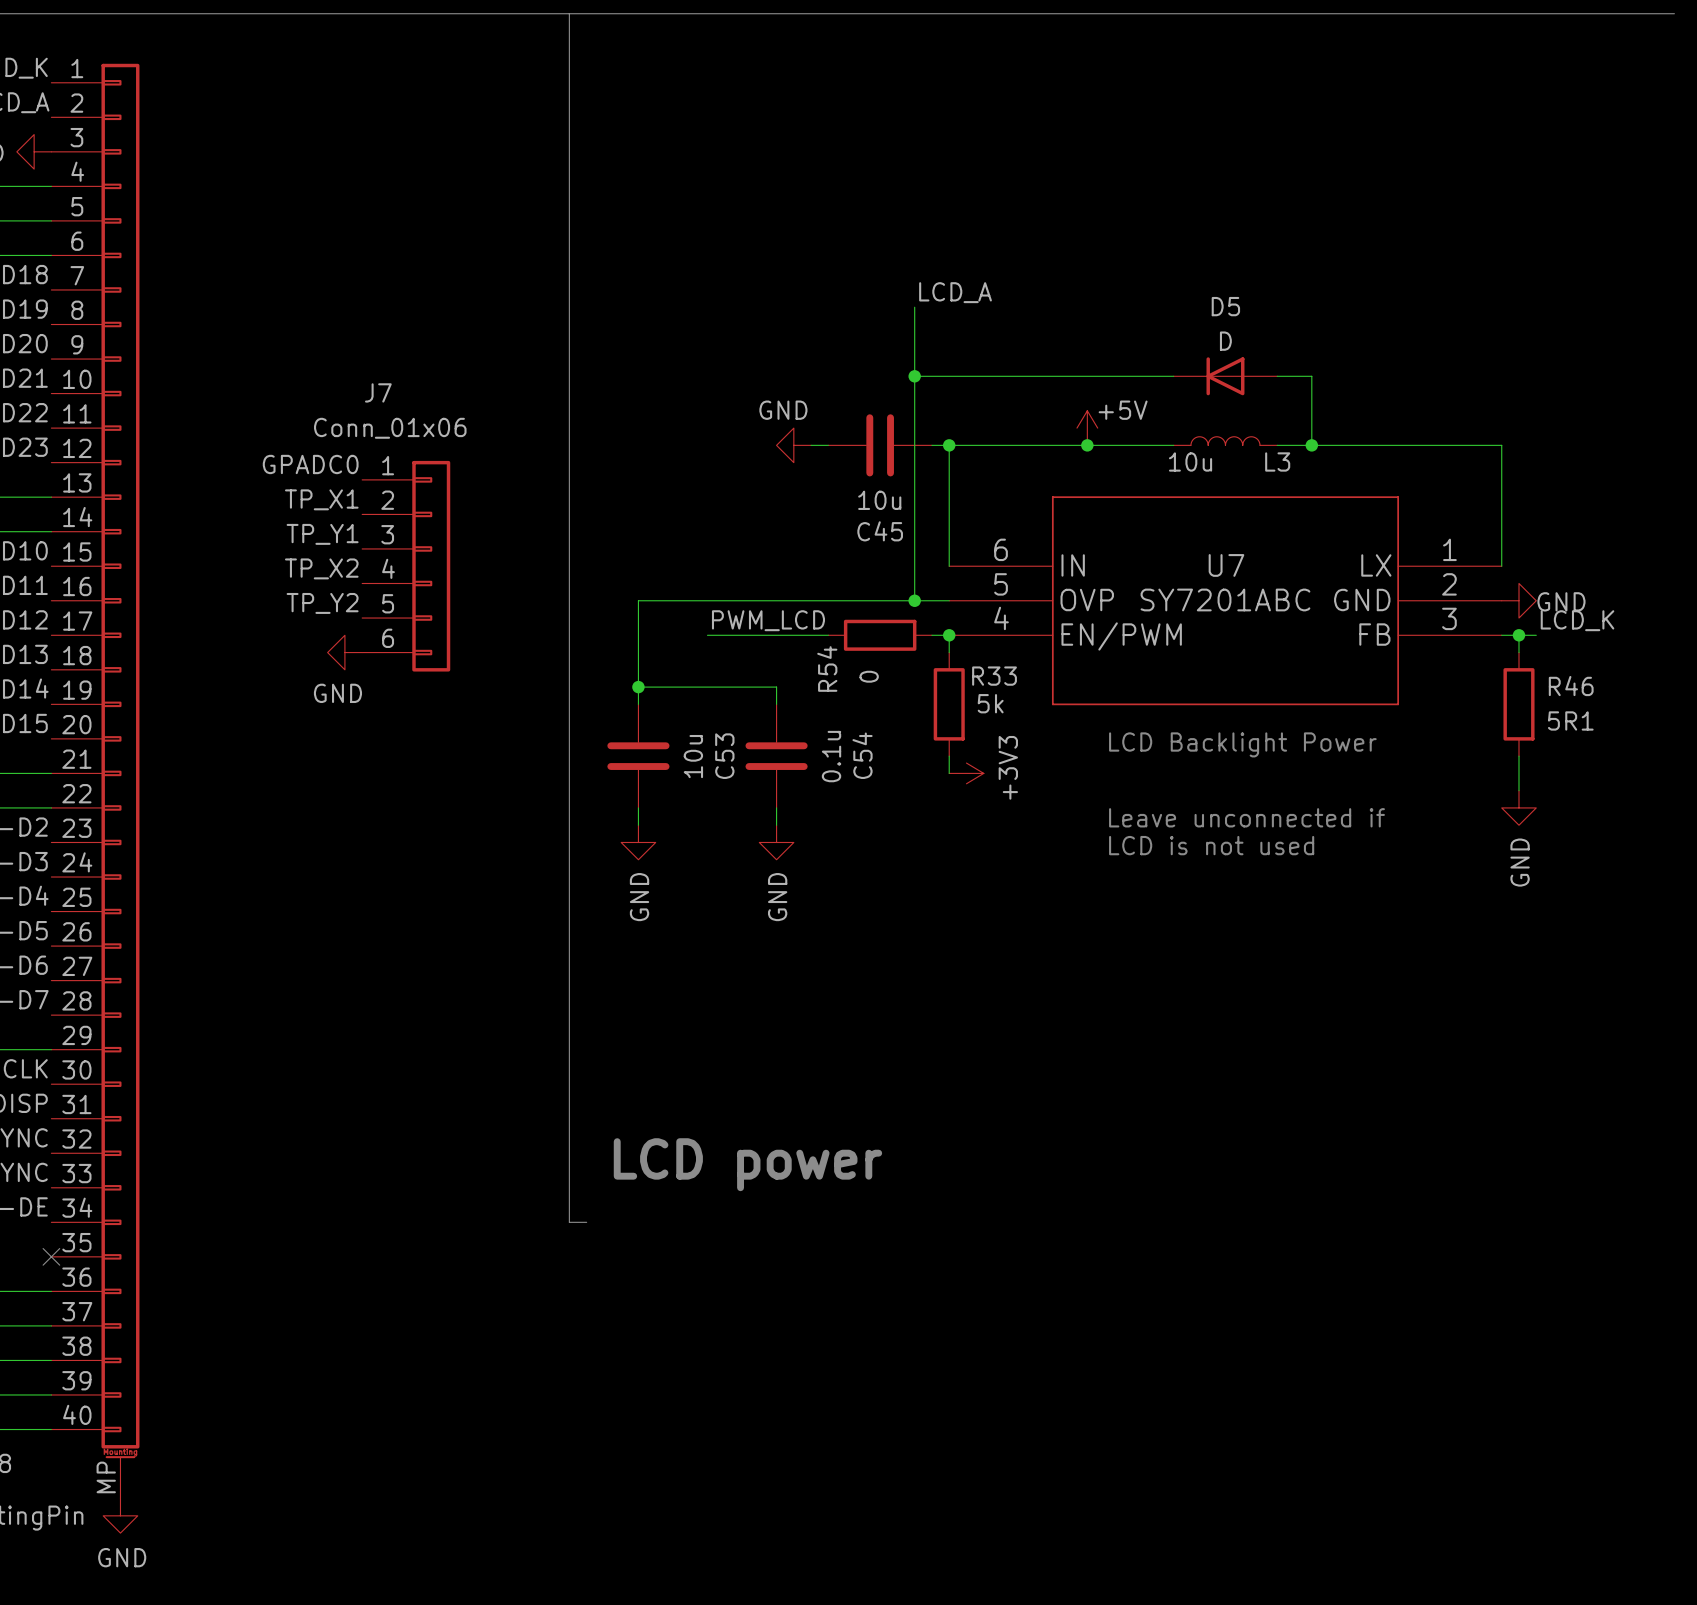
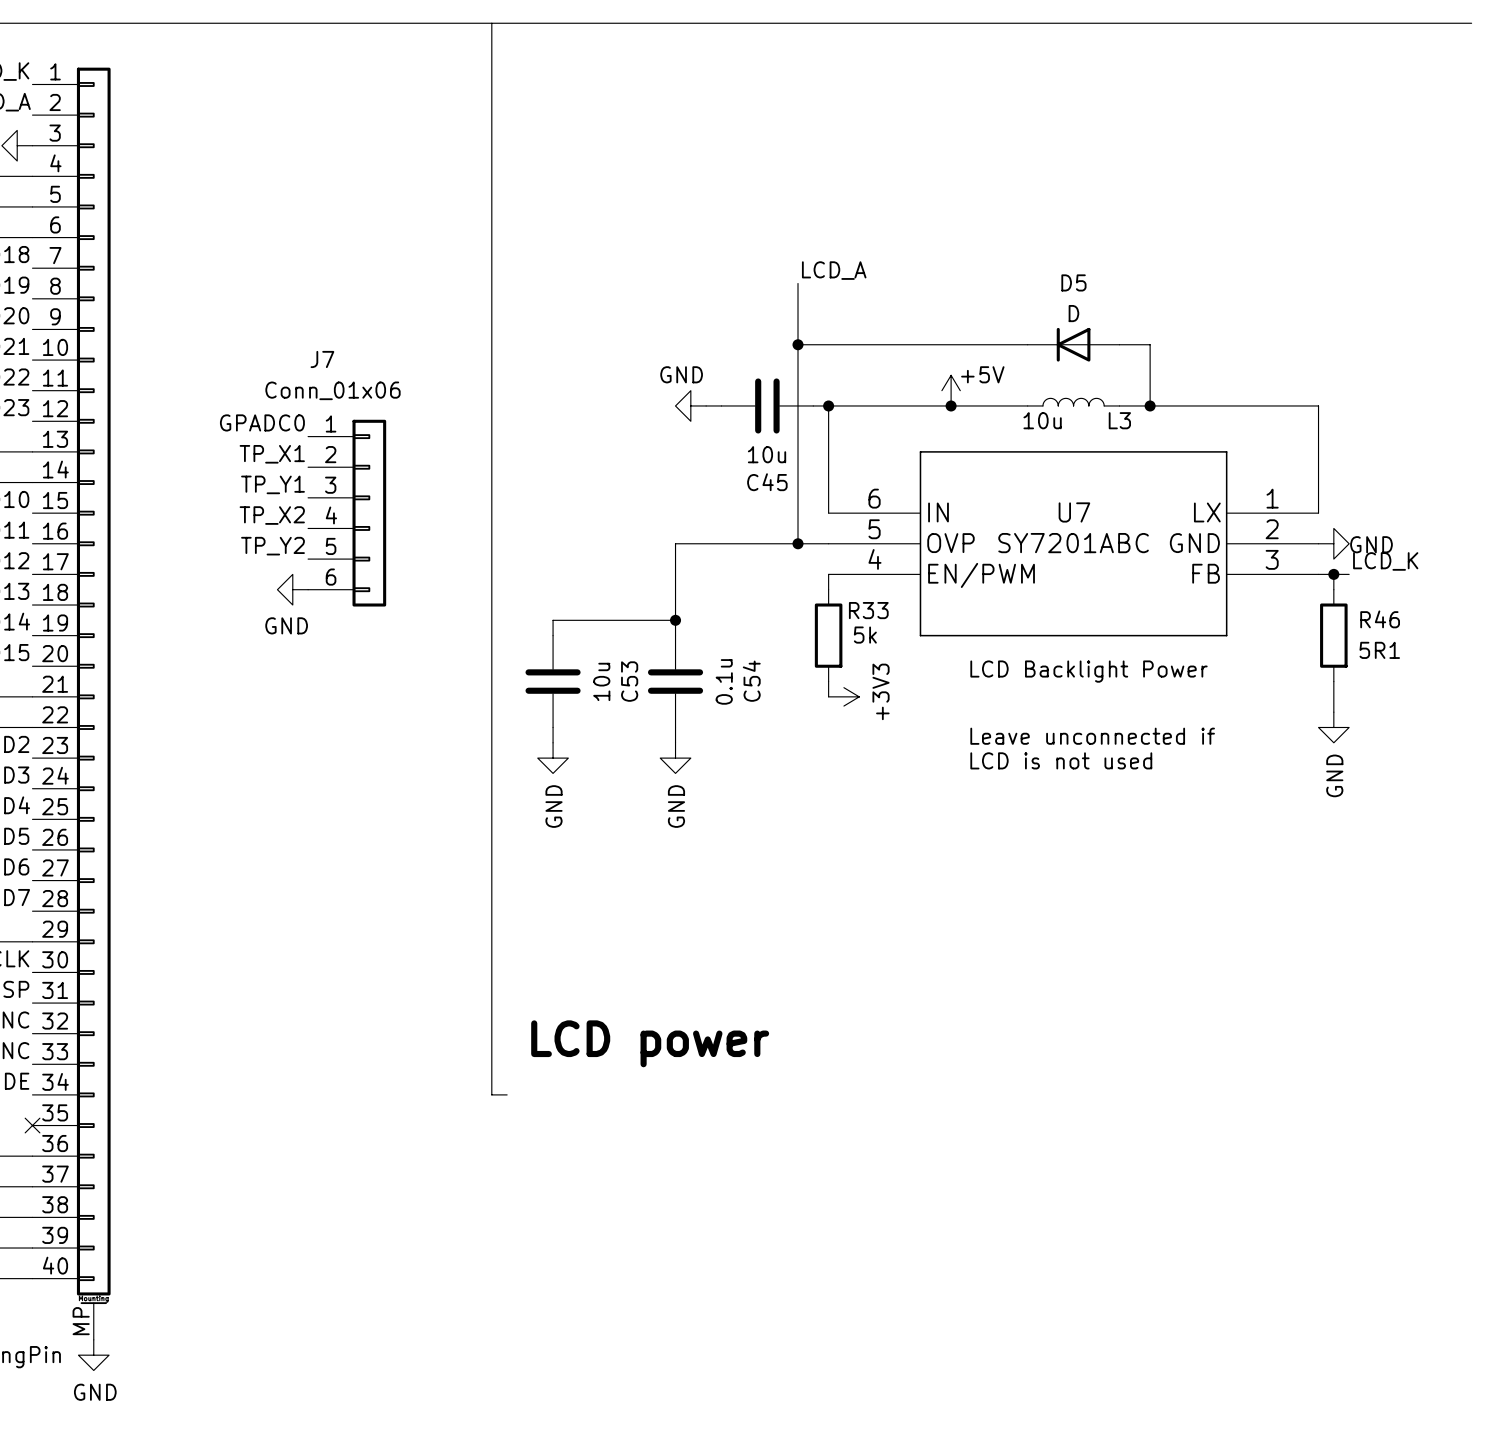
wire: (776, 600) (638, 600) (638, 687) -> (675, 543) (675, 620)
label: PWM_LCD (768, 620) -> none
wire: (707, 635) (828, 635) -> none
R54: 0 (880, 635) -> none
wire: (931, 635) (949, 635) -> none
junction: (949, 635) -> none
junction: (638, 687) -> none
junction: none -> (675, 620)

